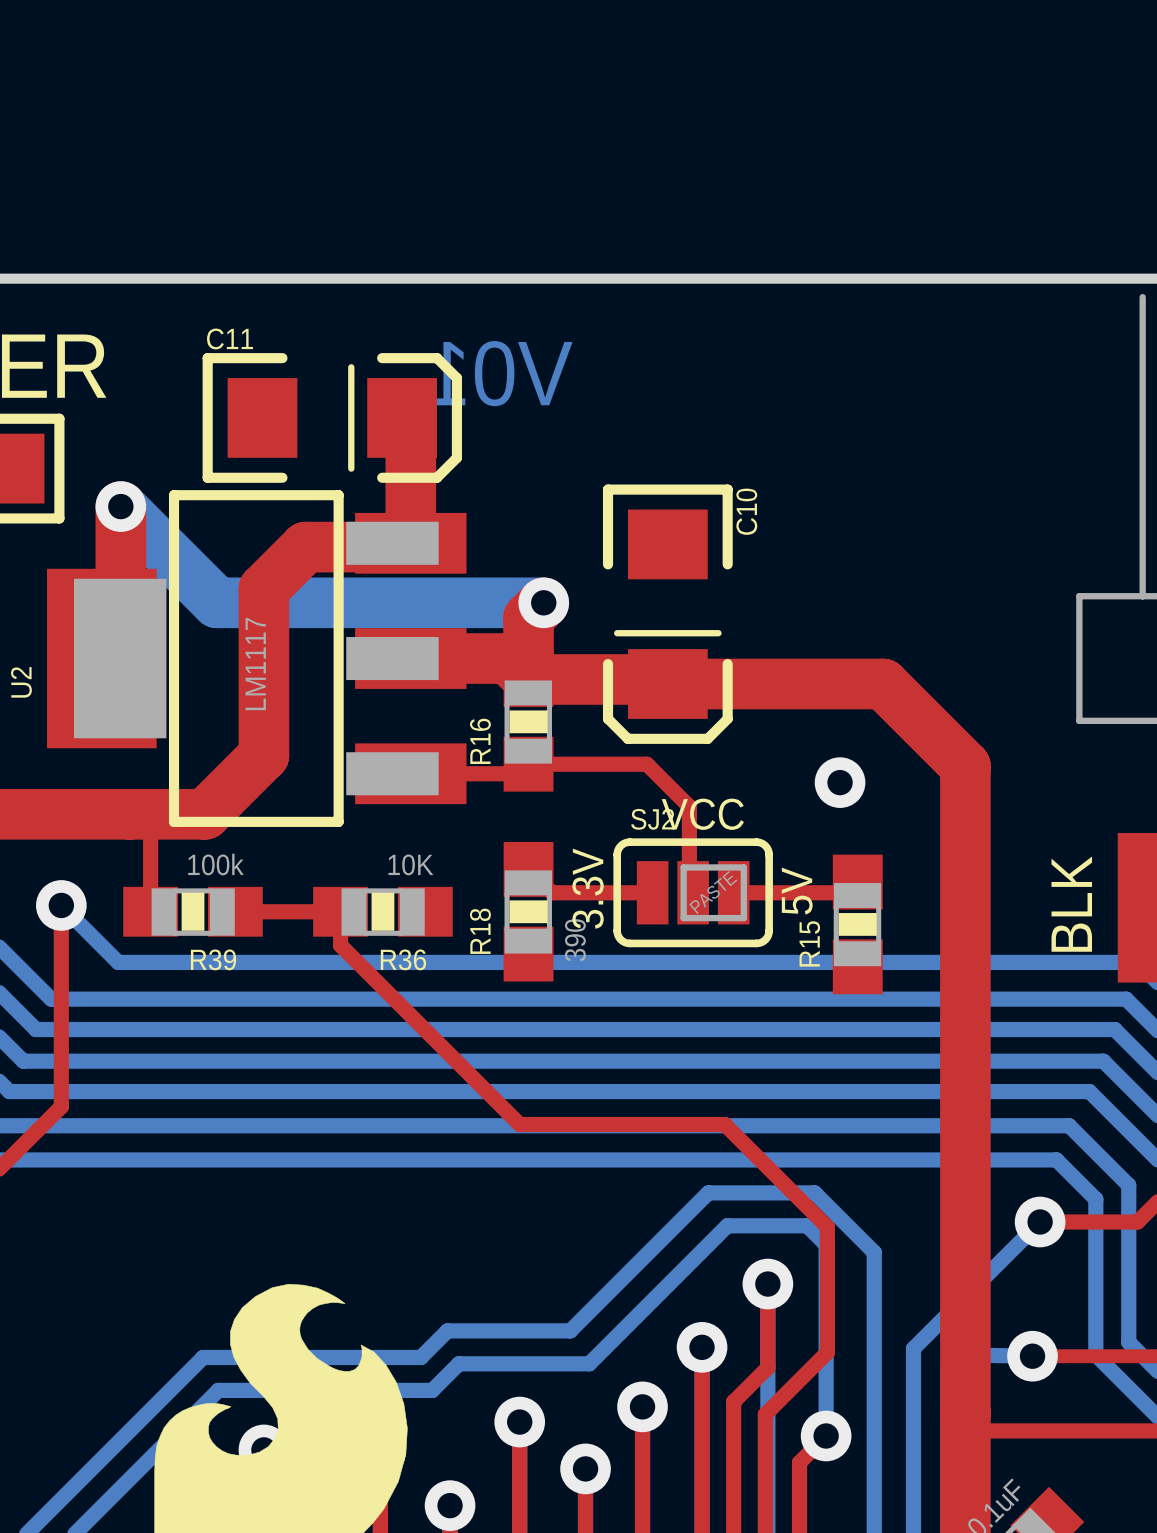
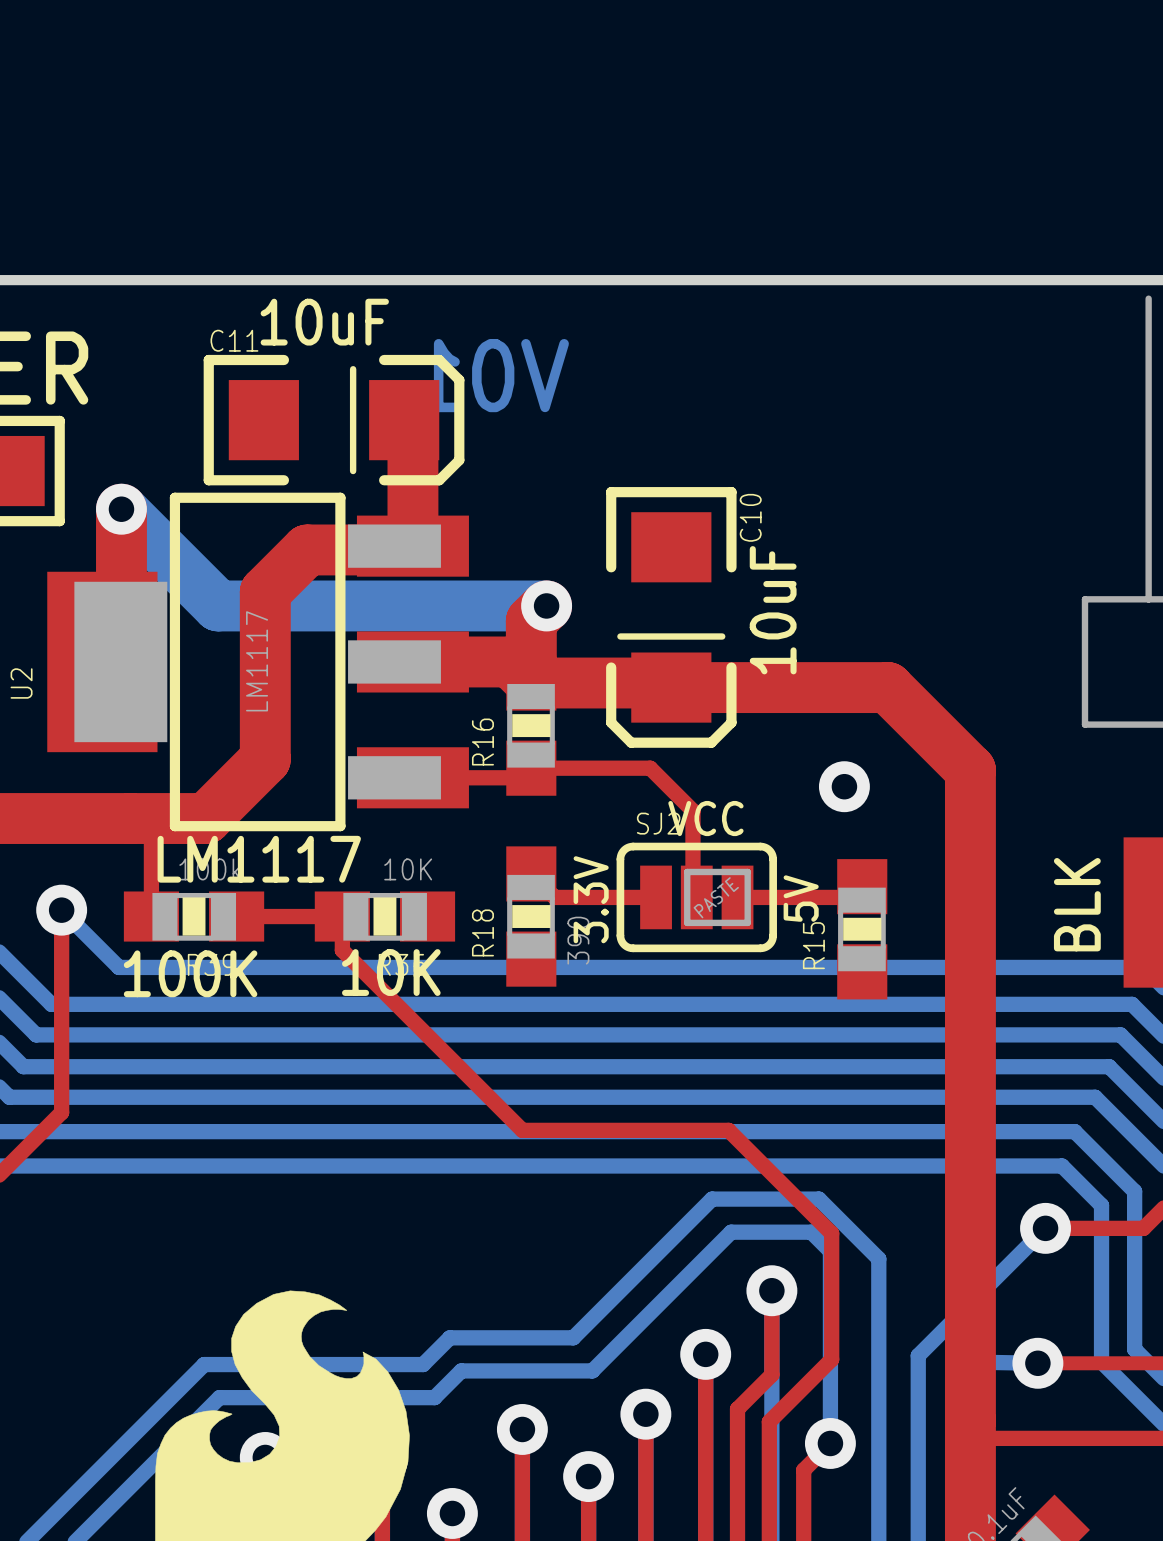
text: none -> 10uF (324, 322)
text: none -> 10uF (773, 610)
text: none -> LM1117 (259, 859)
text: none -> 10K (391, 972)
text: none -> 100K (190, 973)

